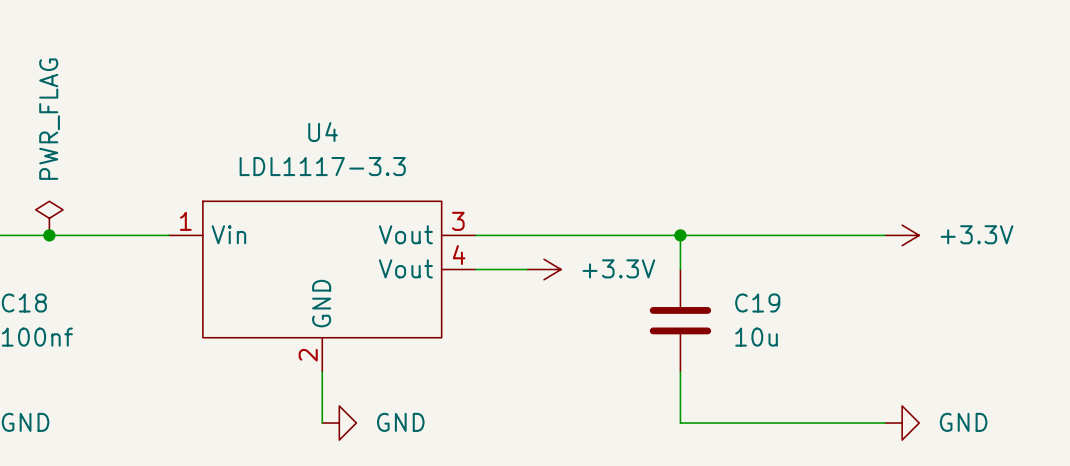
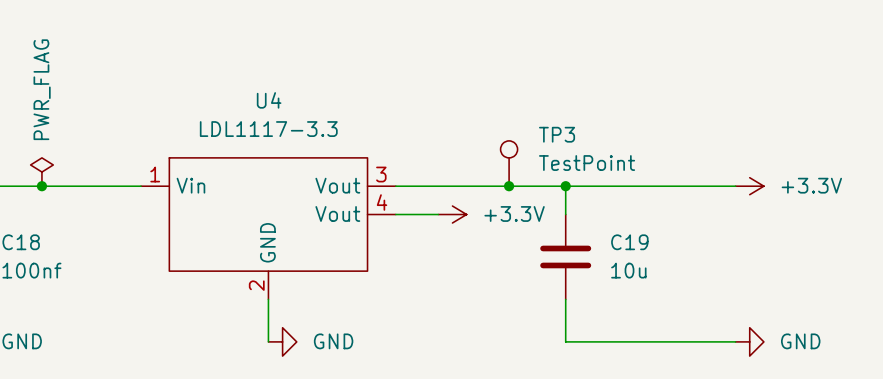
TP3: none -> TestPoint (509, 163)
junction: none -> (509, 186)

